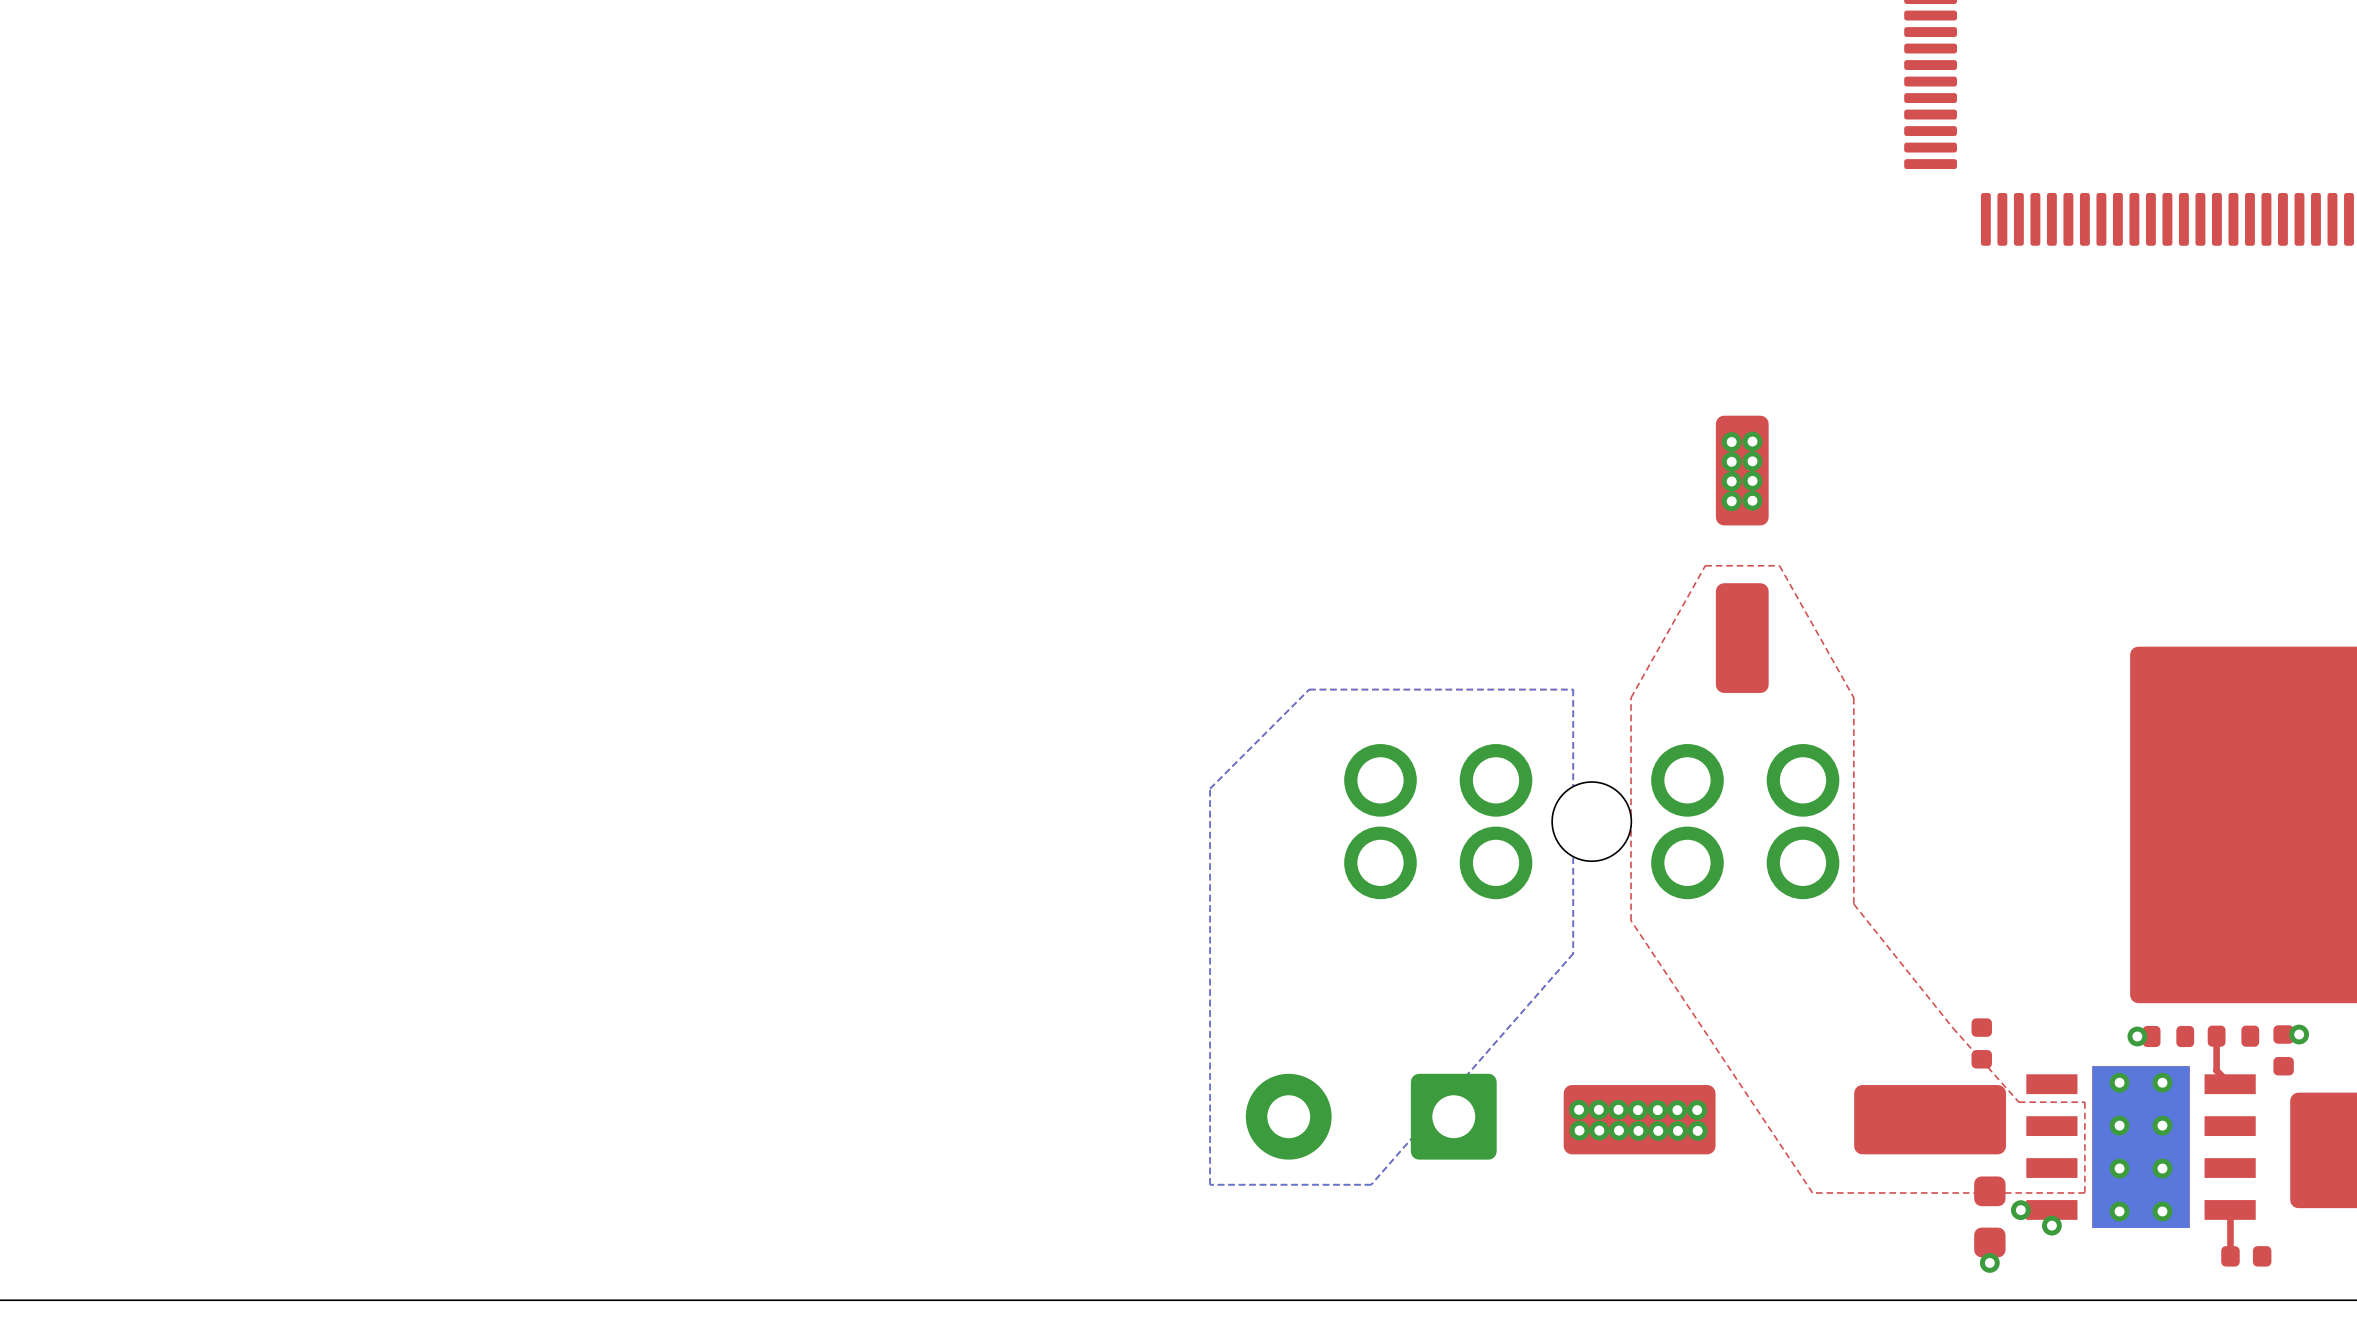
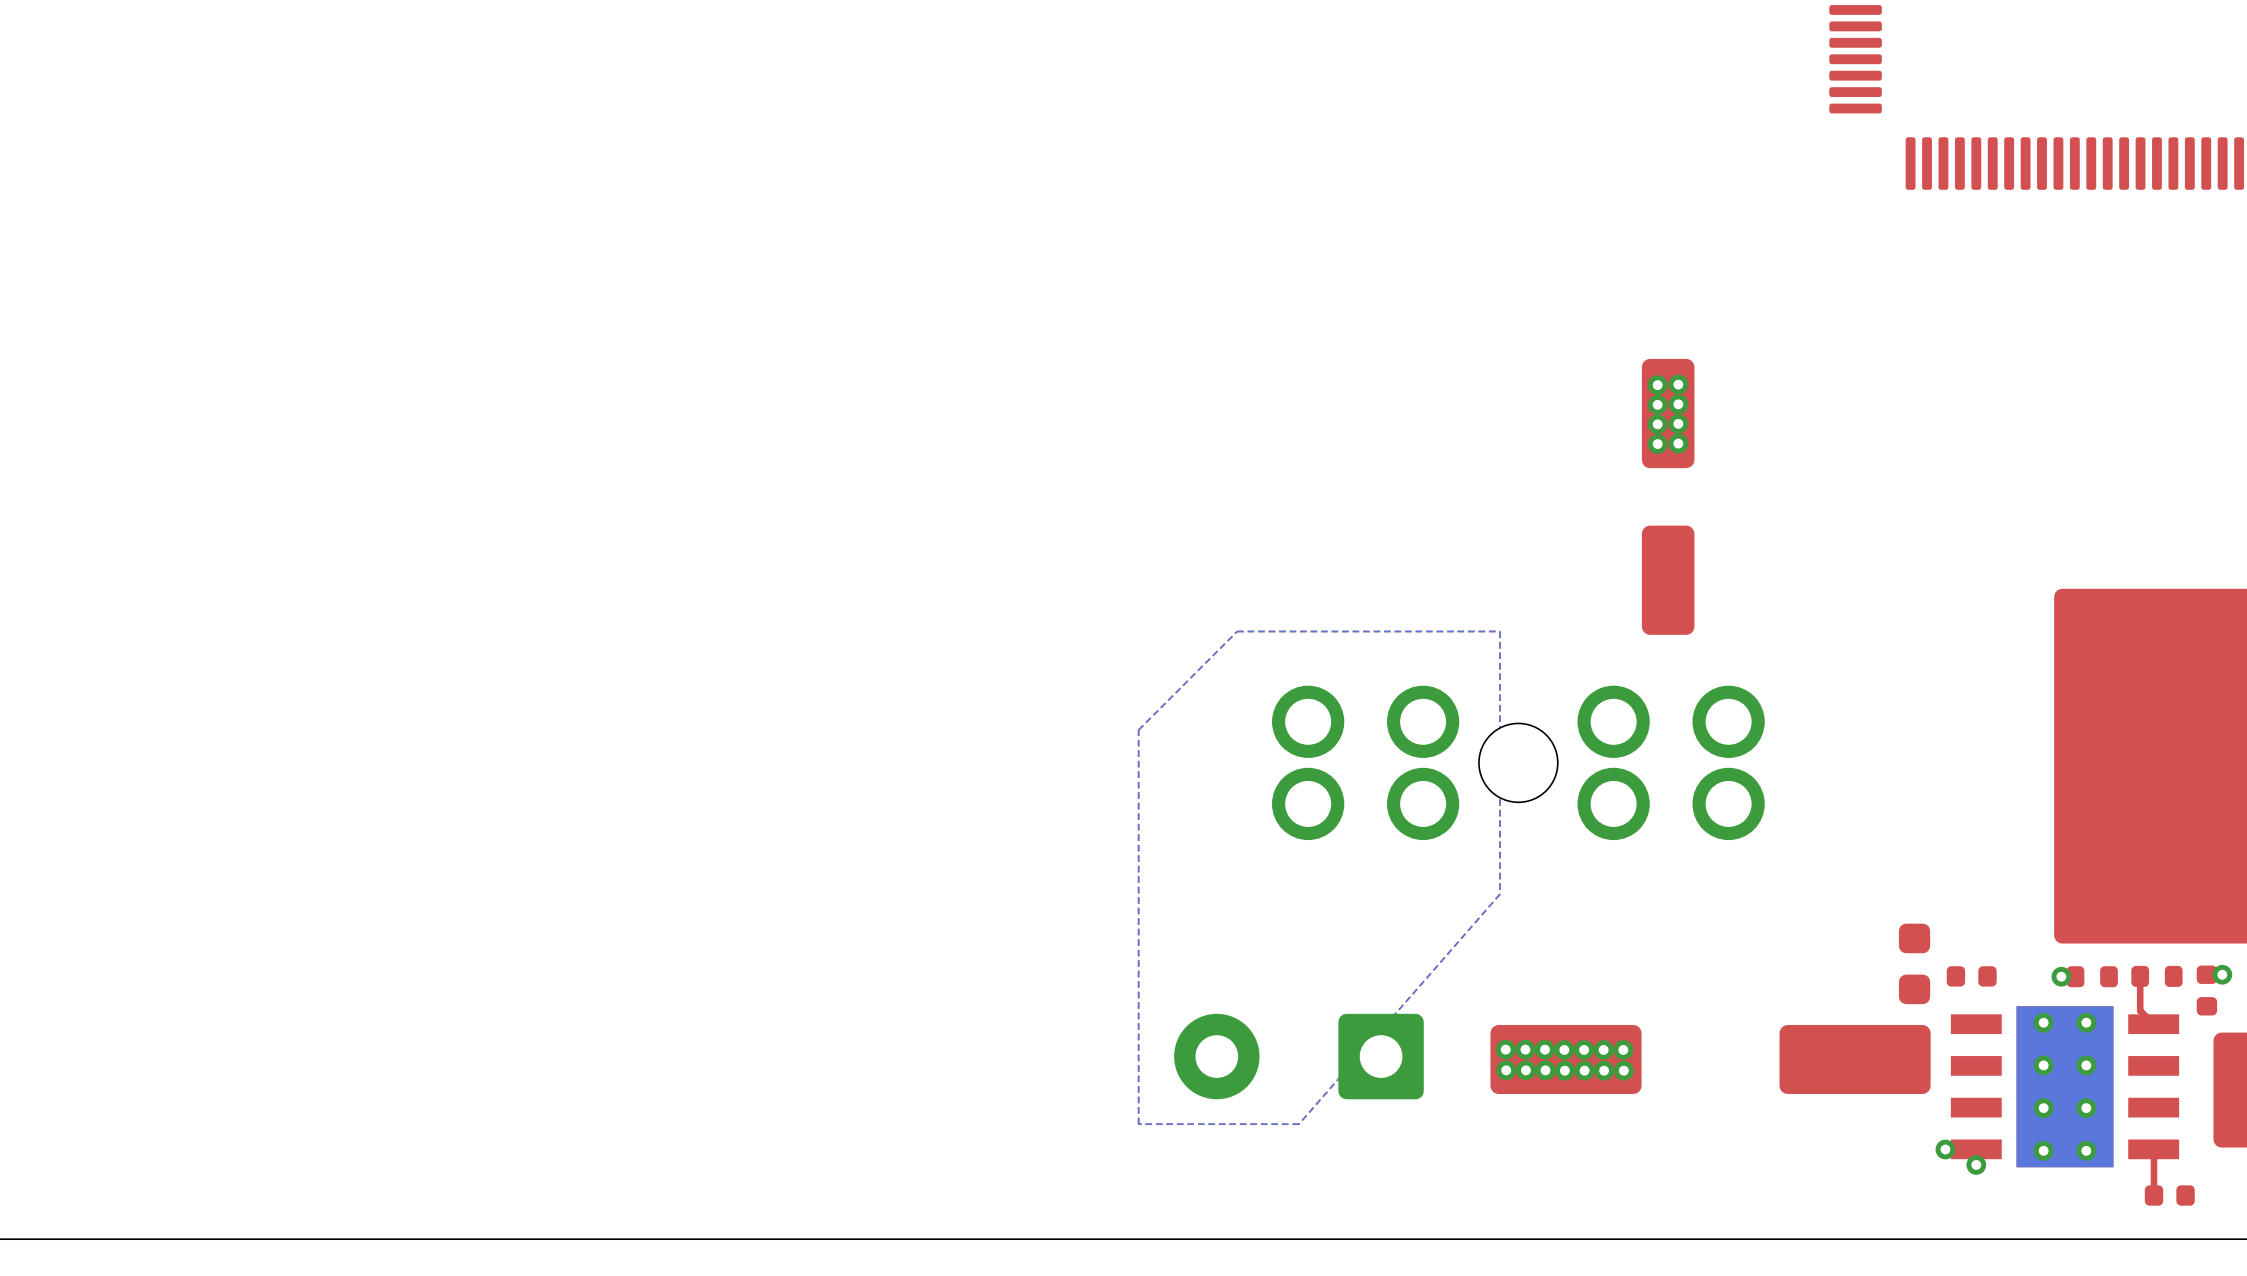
top zone outline: (1779, 565) (1705, 565) (1631, 697) (1631, 920) (1812, 1192) (2084, 1192) (2084, 1102) (2018, 1102) (1952, 1027) (1853, 904) (1853, 697) (1779, 565) -> none
part footprint: [1971, 1018, 1992, 1069] -> [1898, 923, 1931, 1005]
part: none -> (1971, 976)
part: (1989, 1216) -> none
via: (1989, 1262) -> none

